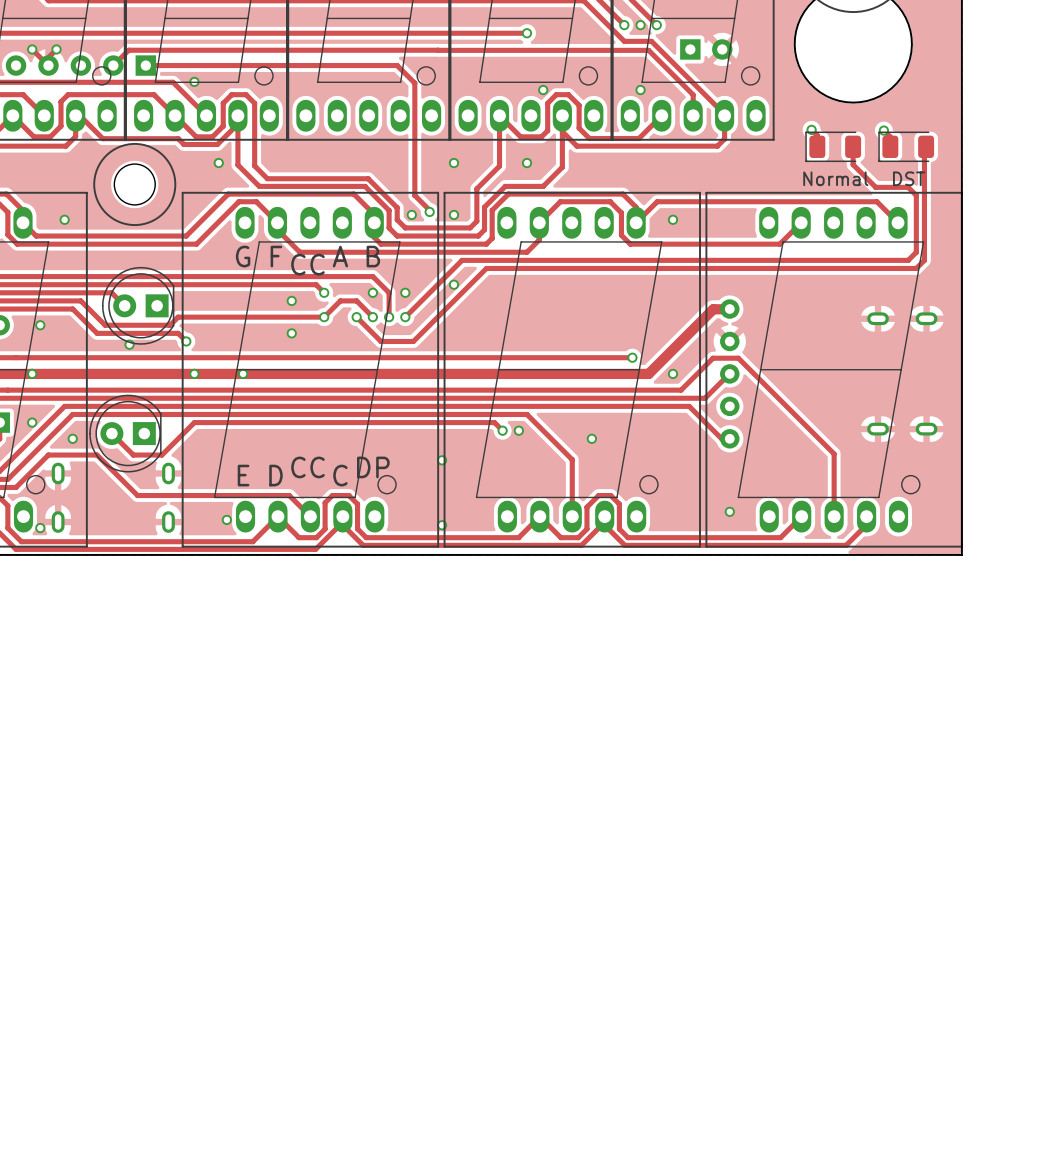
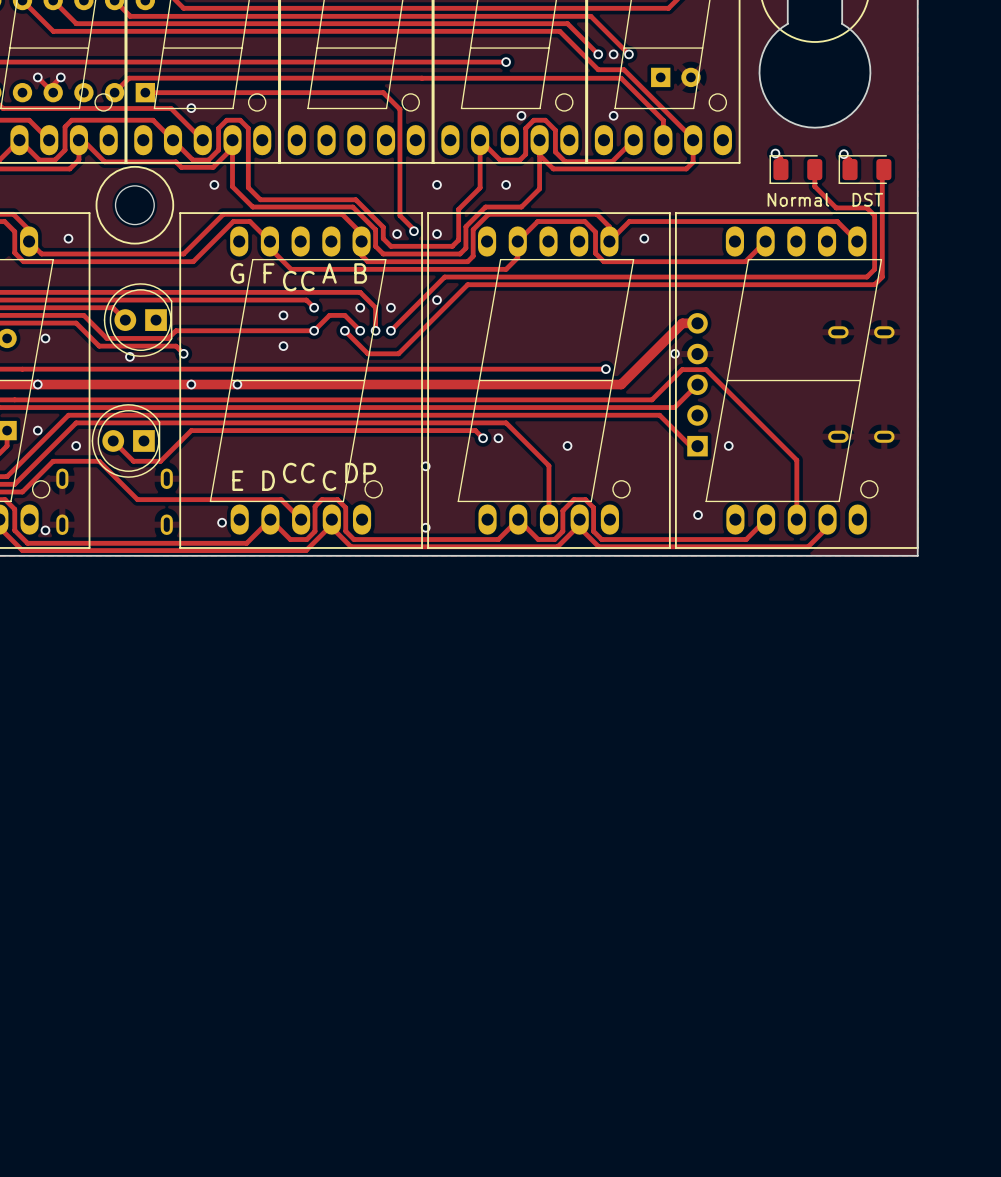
part footprint: [720, 299, 740, 449] -> [687, 313, 708, 457]
via position: (673, 373) -> (675, 353)
via: none -> (728, 445)

